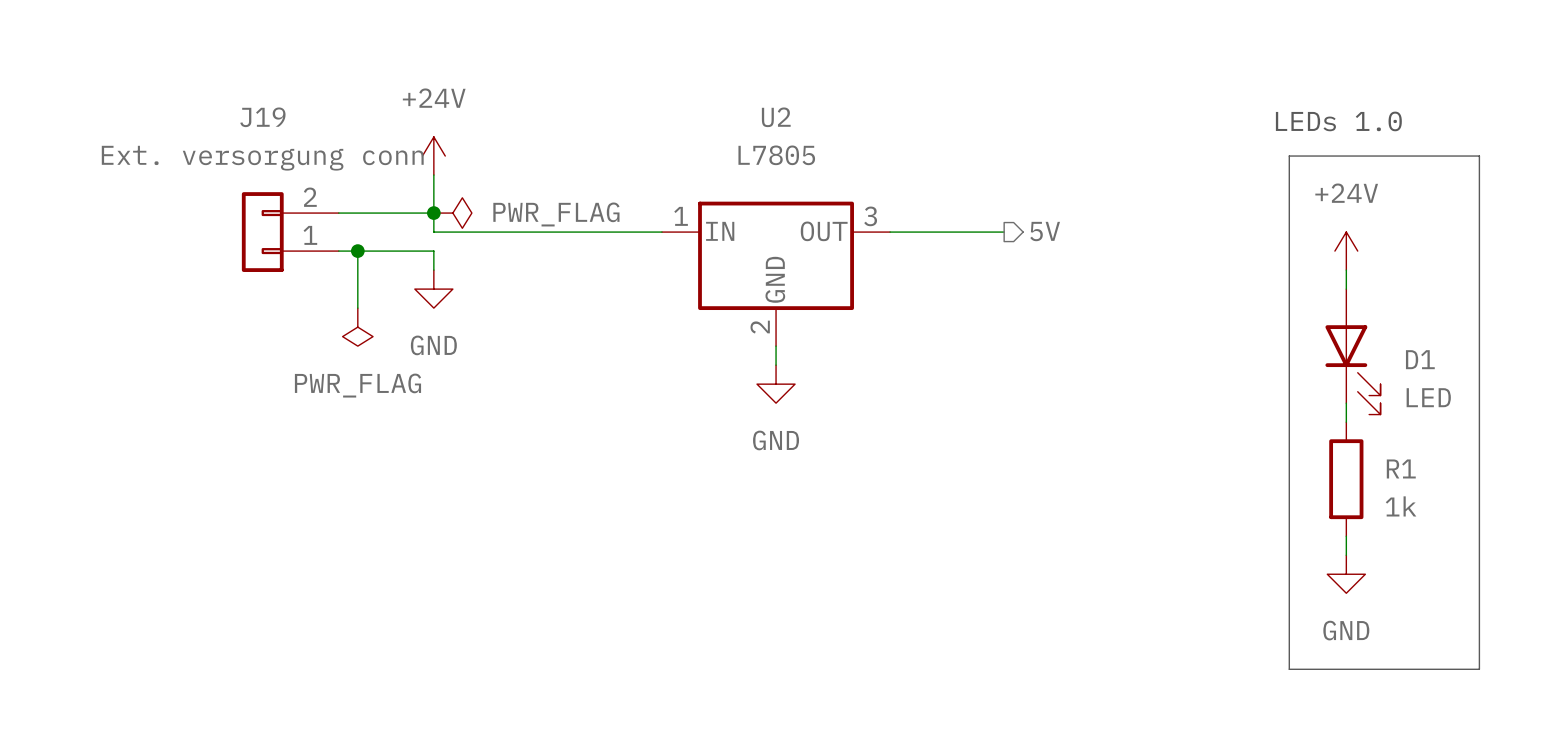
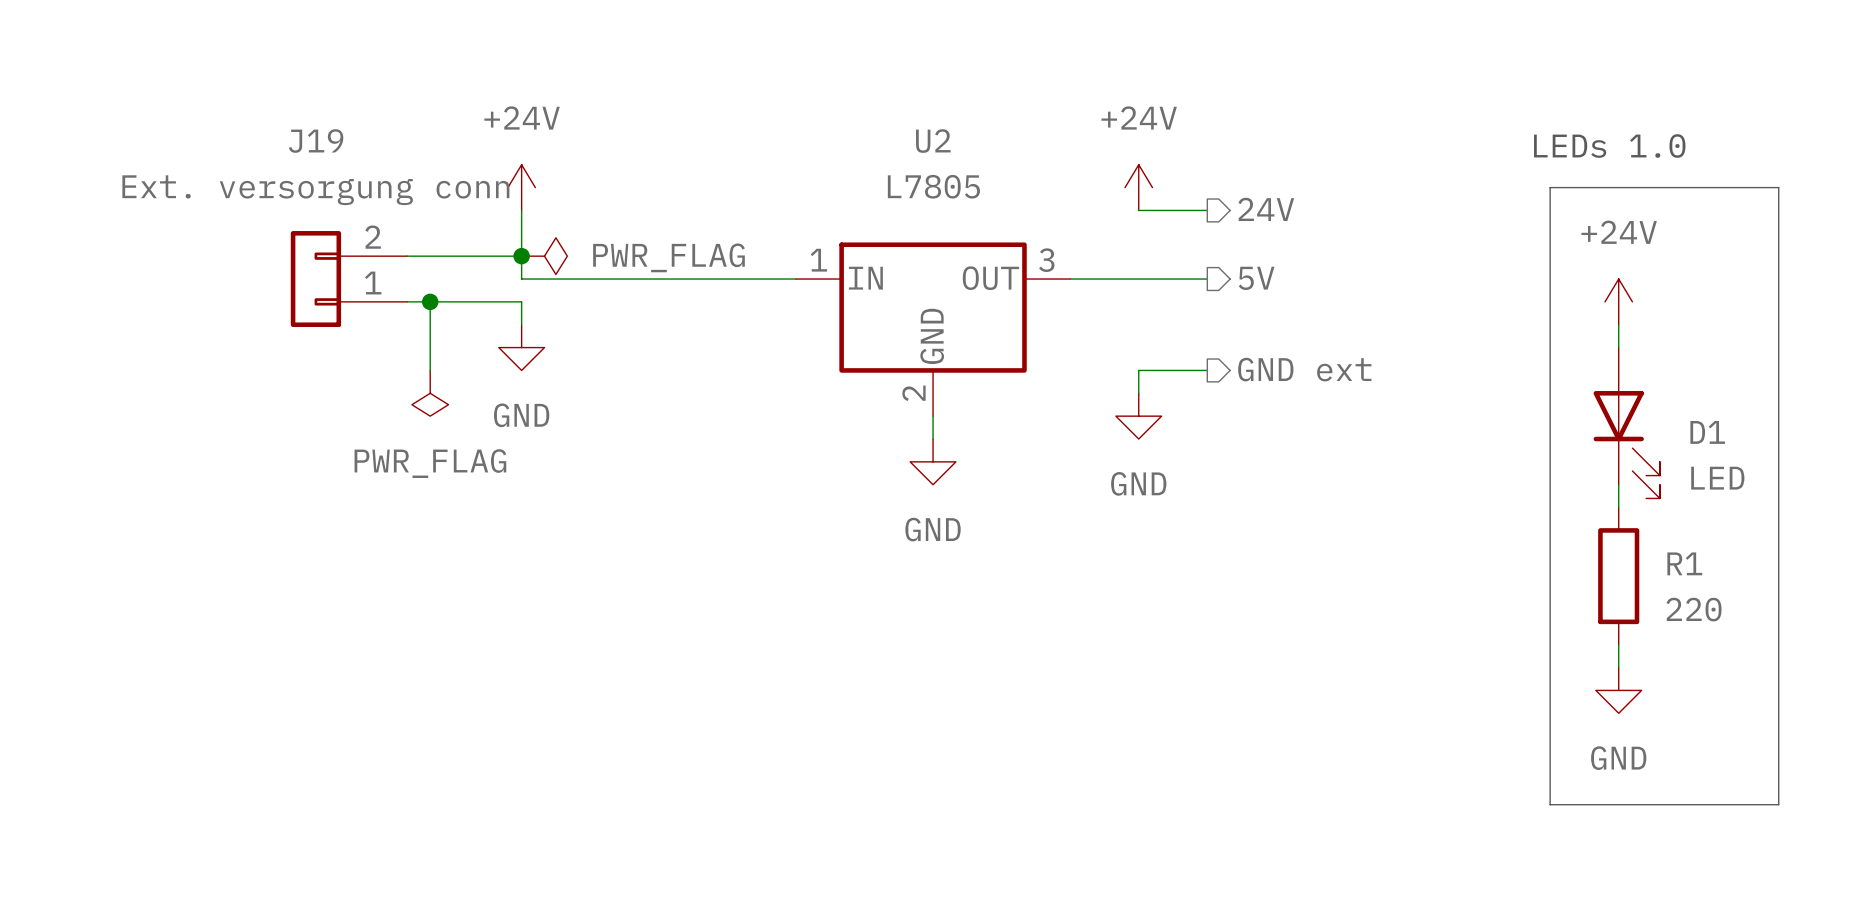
power symbol: none -> +24V (1138, 187)
hierarchical label: none -> 24V (1266, 209)
wire: none -> (1138, 210) (1207, 210)
hierarchical label: none -> GND ext (1304, 369)
wire: none -> (1207, 370) (1138, 370) (1138, 393)
power symbol: none -> GND (1138, 416)
R1 value: 1k (1401, 506) -> 220 (1694, 609)

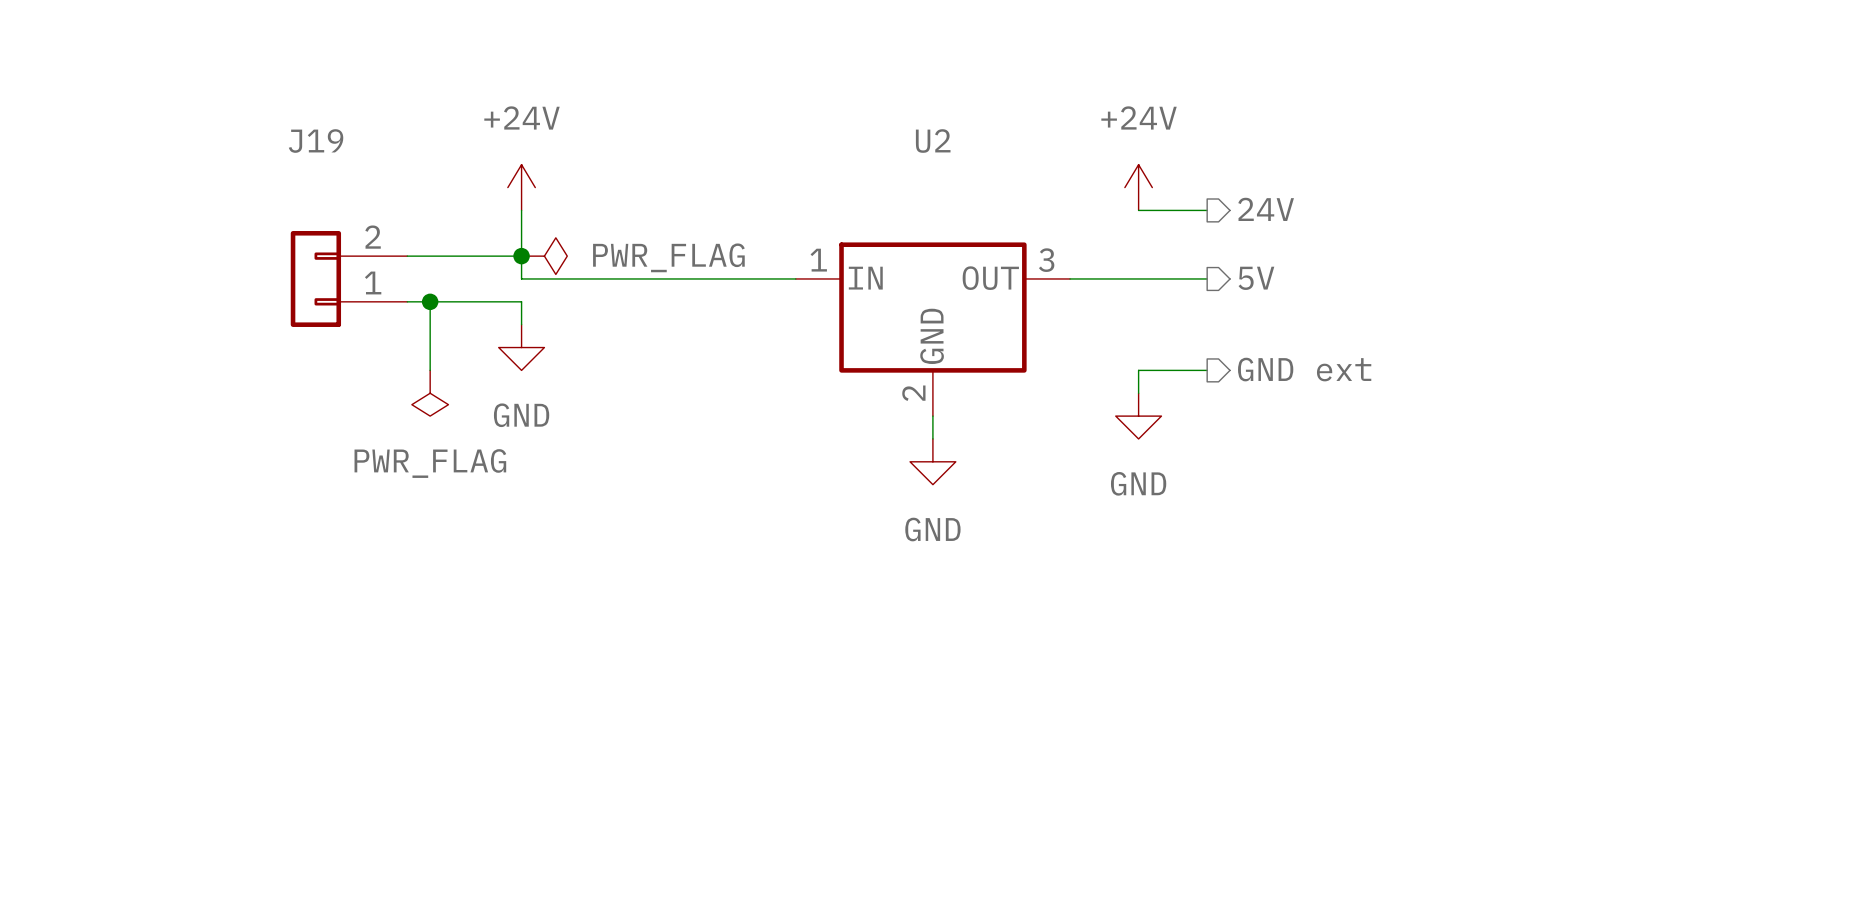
text: LEDs 1.0 (1609, 146) -> none
U2 value: L7805 (933, 186) -> none
line: (1550, 187) (1550, 804) (1778, 804) (1778, 187) (1550, 187) -> none
J19 value: Ext. versorgung conn (315, 190) -> none
power symbol: +24V (1618, 301) -> none
wire: (1618, 324) (1618, 347) -> none
D1: LED (1626, 423) -> none
wire: (1618, 484) (1618, 507) -> none
R1: 220 (1618, 576) -> none
wire: (1618, 644) (1618, 667) -> none
power symbol: GND (1618, 690) -> none

